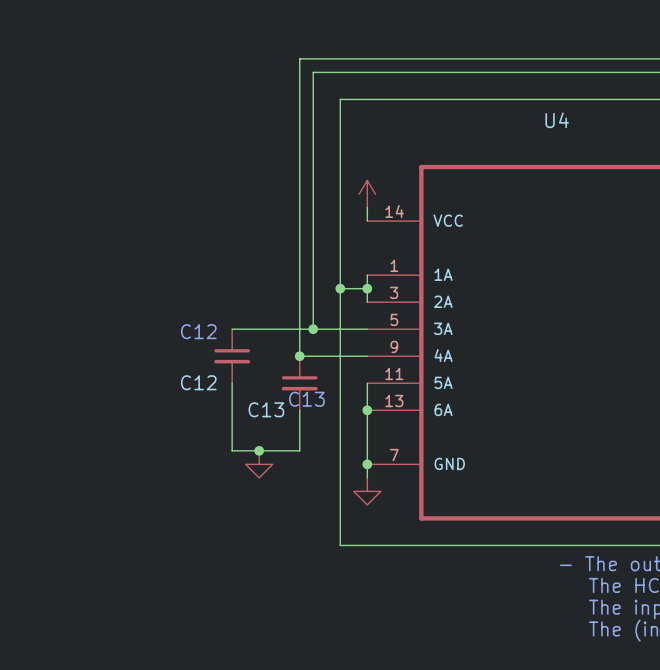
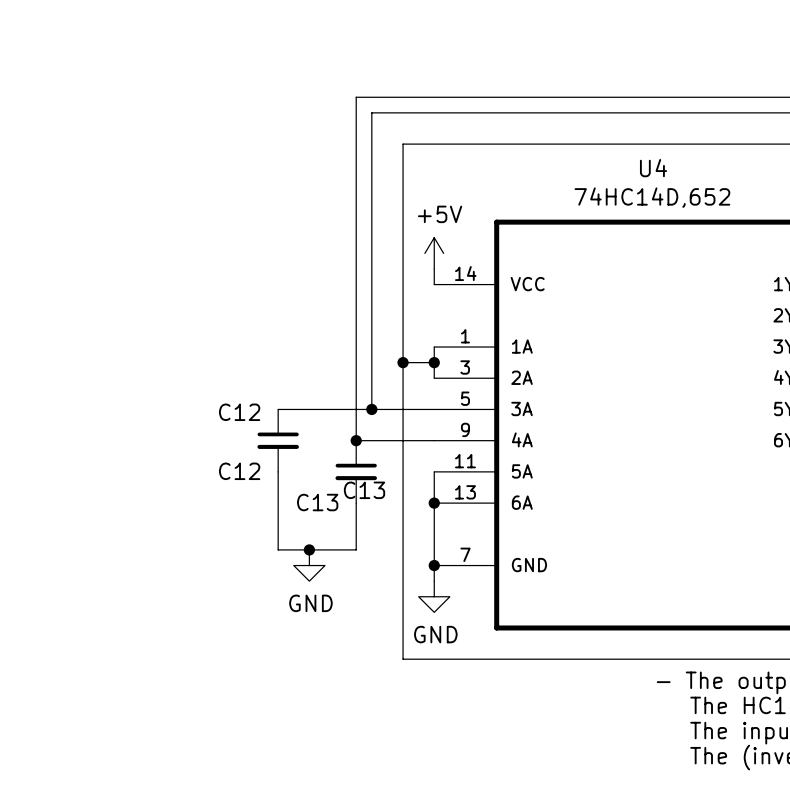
U4 value: none -> 74HC14D,652 (652, 197)
power symbol text: none -> +5V (440, 214)
power symbol text: none -> GND (310, 603)
power symbol text: none -> GND (435, 634)

